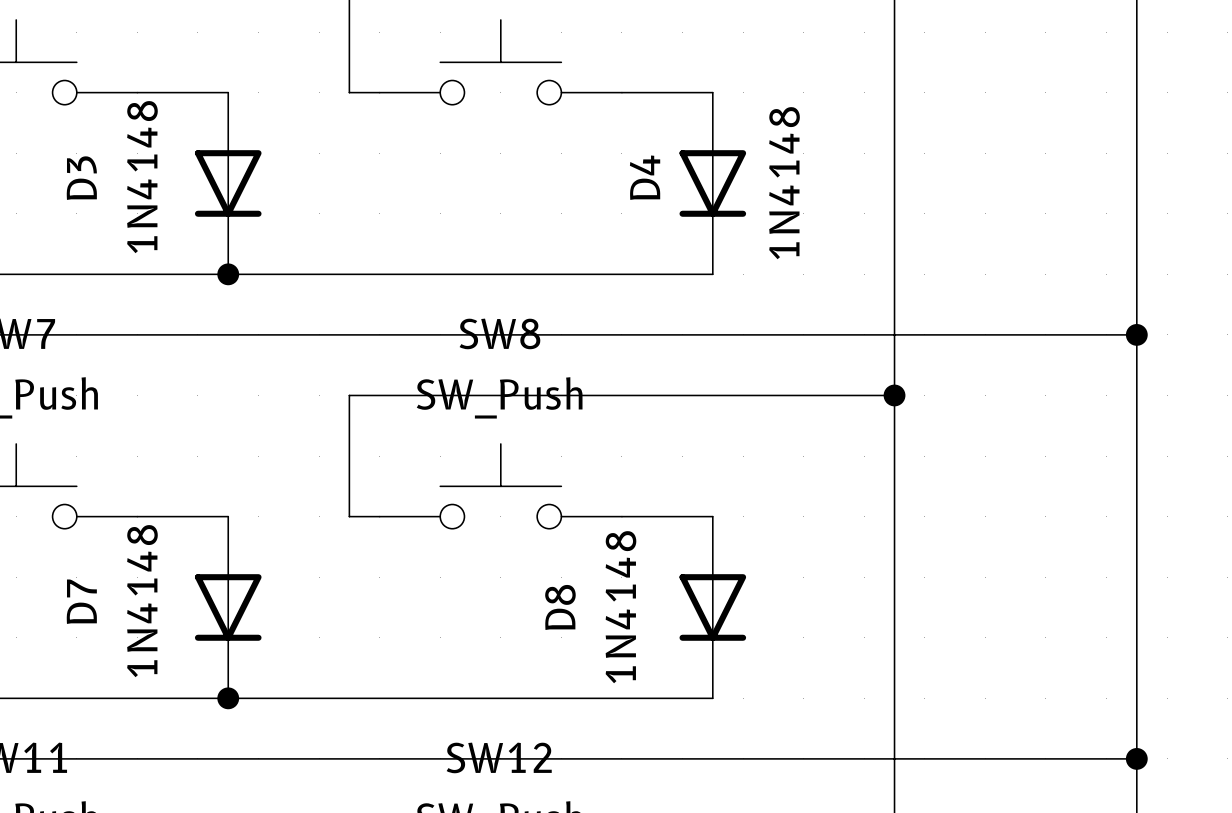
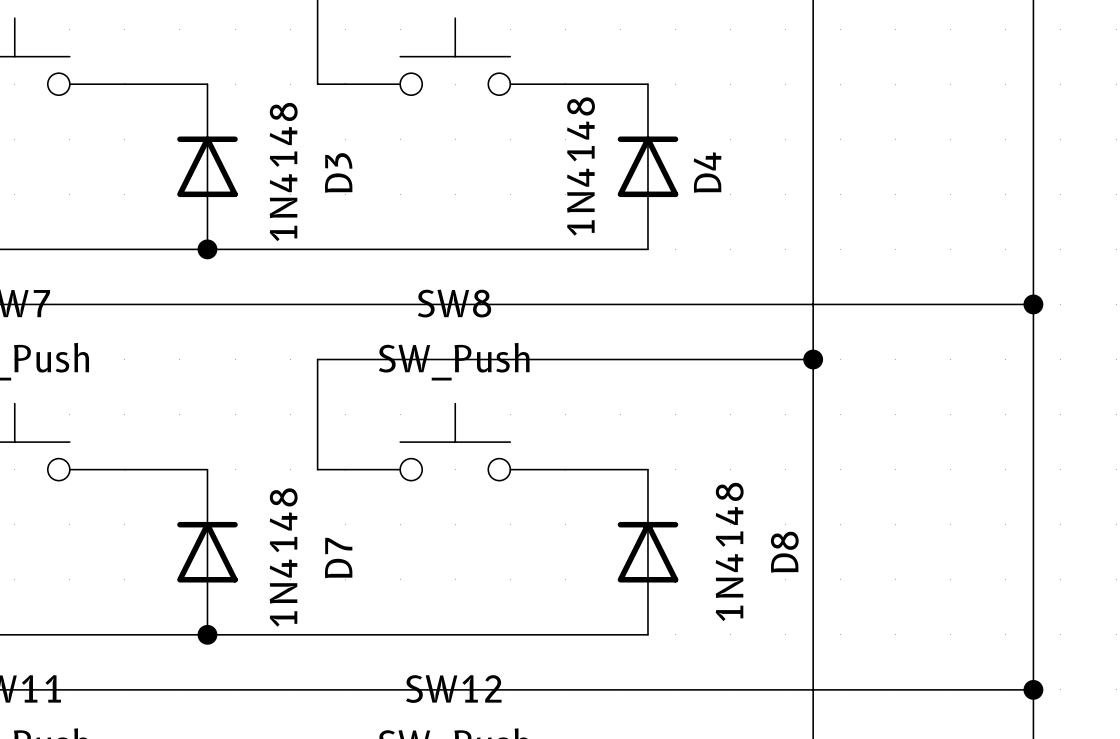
D3 rotation: 0° (228, 183) -> 180° (207, 166)
D4 rotation: 0° (712, 183) -> 180° (647, 166)
D7 rotation: 0° (228, 607) -> 180° (207, 552)
D8 rotation: 0° (712, 607) -> 180° (647, 552)

